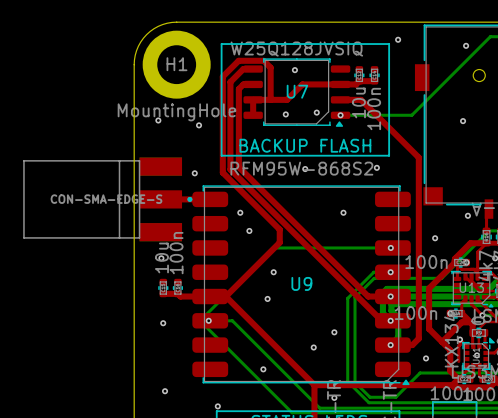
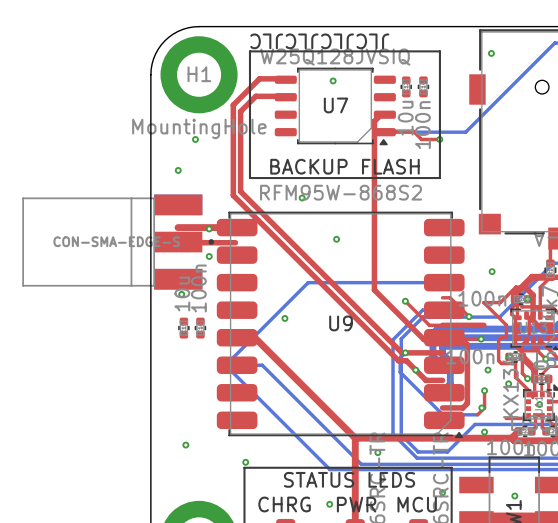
text: none -> JLCJLCJLCJLC (319, 41)
via: (398, 39) -> none
via: none -> (491, 53)
via: (466, 45) -> none
top track: none -> (293, 78) (259, 78) (233, 105) (233, 195) (398, 360) (406, 360) (426, 380) (442, 380)
top track: (253, 69) (243, 69) (230, 82) (230, 169) (381, 320) (390, 320) -> none
top track: (374, 81) (359, 81) (356, 84) (302, 84) (287, 99) (253, 99) (253, 115) -> none
top track: none -> (293, 96) (255, 96) (240, 111) (240, 191) (401, 352) (442, 352)
top track: (253, 84) (243, 84) (238, 89) (238, 167) (368, 296) (390, 296) -> none
top track: (270, 99) (270, 67) (263, 60) (238, 60) (222, 76) (222, 172) (279, 229) (279, 242) (225, 296) (180, 296) (177, 293) (163, 293) -> none
top track: (340, 99) (361, 99) (418, 157) (418, 338) (412, 345) (390, 345) -> none
top track: none -> (393, 113) (382, 113) (374, 121) (374, 290) (424, 339) (462, 339)
via: (316, 112) -> none
via: (285, 114) -> none
top track: none -> (393, 131) (413, 131) (421, 139) (439, 139)
via: (340, 115) -> none
via: (158, 120) -> none
via: none -> (195, 139)
via: none -> (439, 139)
via: (463, 121) -> none
via: (199, 125) -> none
via: none -> (178, 170)
via: (376, 167) -> none
via: (305, 169) -> none
via: (194, 173) -> none
via: none -> (302, 197)
part position: (107, 199) -> (118, 242)
via: none -> (209, 228)
via: none -> (336, 239)
top track: none -> (178, 242) (235, 242)
via: (240, 212) -> none
via: (343, 212) -> none
via: (467, 215) -> none
via: none -> (209, 256)
via: (249, 230) -> none
via: (390, 247) -> none
top track: none -> (442, 297) (450, 297) (469, 316)
top track: (454, 262) (429, 288) (429, 328) (450, 350) (450, 370) (458, 379) (467, 370) (467, 365) -> none
top track: none -> (405, 301) (429, 325) (483, 325)
via: none -> (405, 301)
top track: none -> (518, 301) (511, 308) (511, 314) (515, 318) (515, 345) (520, 350) (538, 350) (538, 343)
via: (273, 272) -> none
via: (390, 272) -> none
via: none -> (469, 316)
via: none -> (284, 318)
top track: none -> (529, 334) (529, 318) (533, 314) (533, 295) (525, 287) (515, 287) (500, 302) (483, 302) (506, 325) (506, 337) (502, 337) (498, 340) (498, 360) (501, 363) (511, 363) (515, 359) (515, 377) (532, 394) (532, 397)
via: (390, 296) -> none
top track: none -> (481, 339) (462, 339)
via: none -> (481, 339)
via: (267, 298) -> none
top track: none -> (462, 339) (467, 344) (467, 403) (462, 407) (442, 407)
bottom track: none -> (405, 352) (400, 358) (400, 372) (442, 414) (477, 414)
via: none -> (405, 352)
top track: none -> (522, 359) (522, 373) (527, 378)
via: (208, 320) -> none
via: (390, 320) -> none
top track: (470, 322) (461, 322) (442, 342) -> none
via: (163, 323) -> none
via: none -> (415, 370)
via: none -> (488, 370)
via: (334, 332) -> none
via: none -> (527, 378)
via: none -> (508, 383)
via: (460, 339) -> none
top track: none -> (484, 390) (484, 407) (477, 414)
via: none -> (484, 390)
via: (390, 345) -> none
top track: (467, 346) (460, 339) (458, 361) -> none
via: (313, 347) -> none
top track: none -> (506, 418) (525, 418)
via: (263, 369) -> none
via: none -> (484, 432)

